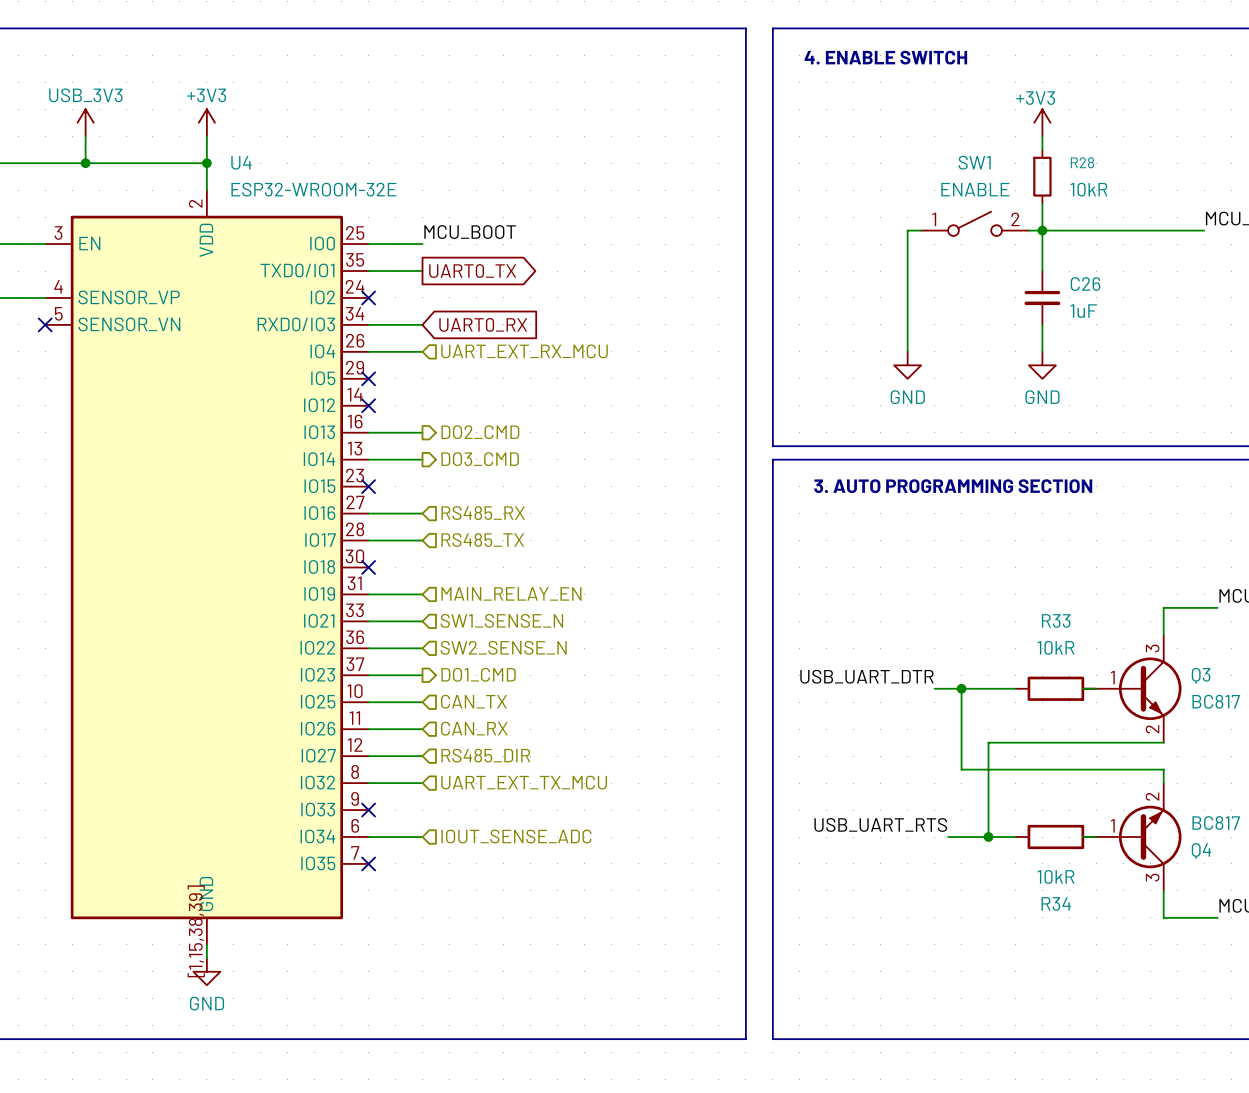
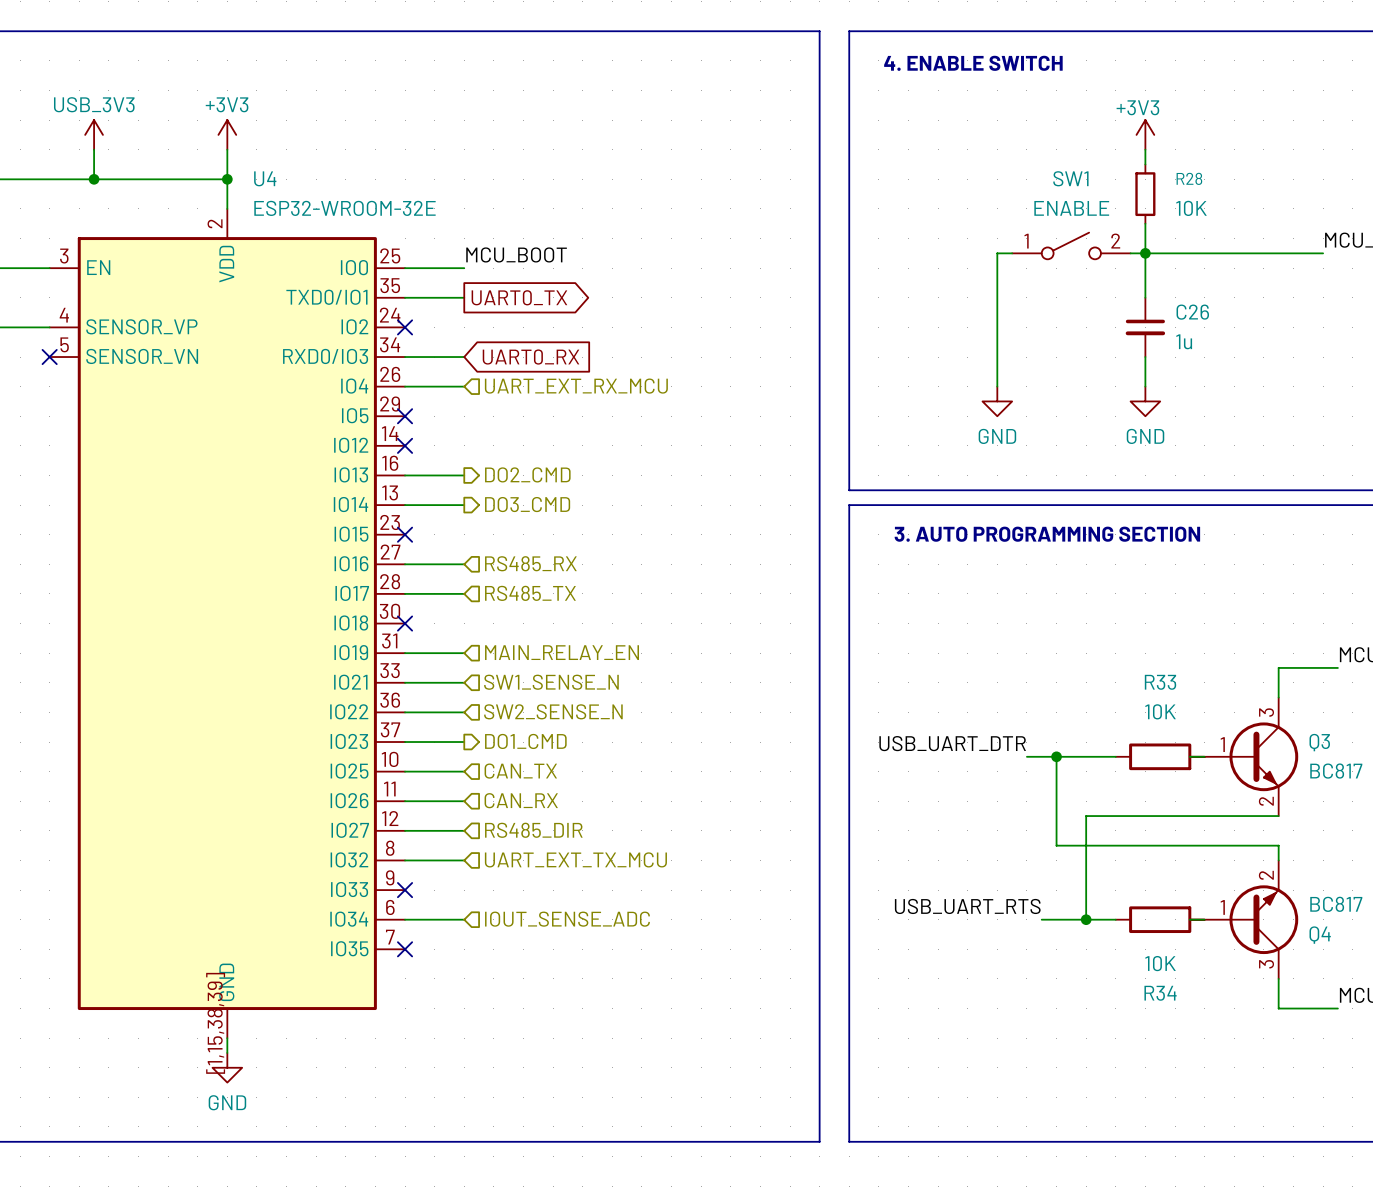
R28 value: 10kR (1088, 189) -> 10K (1191, 208)
C26 value: 1uF (1083, 311) -> 1u (1184, 341)
R33 value: 10kR (1055, 647) -> 10K (1160, 711)
R34 value: 10kR (1055, 876) -> 10K (1160, 963)

